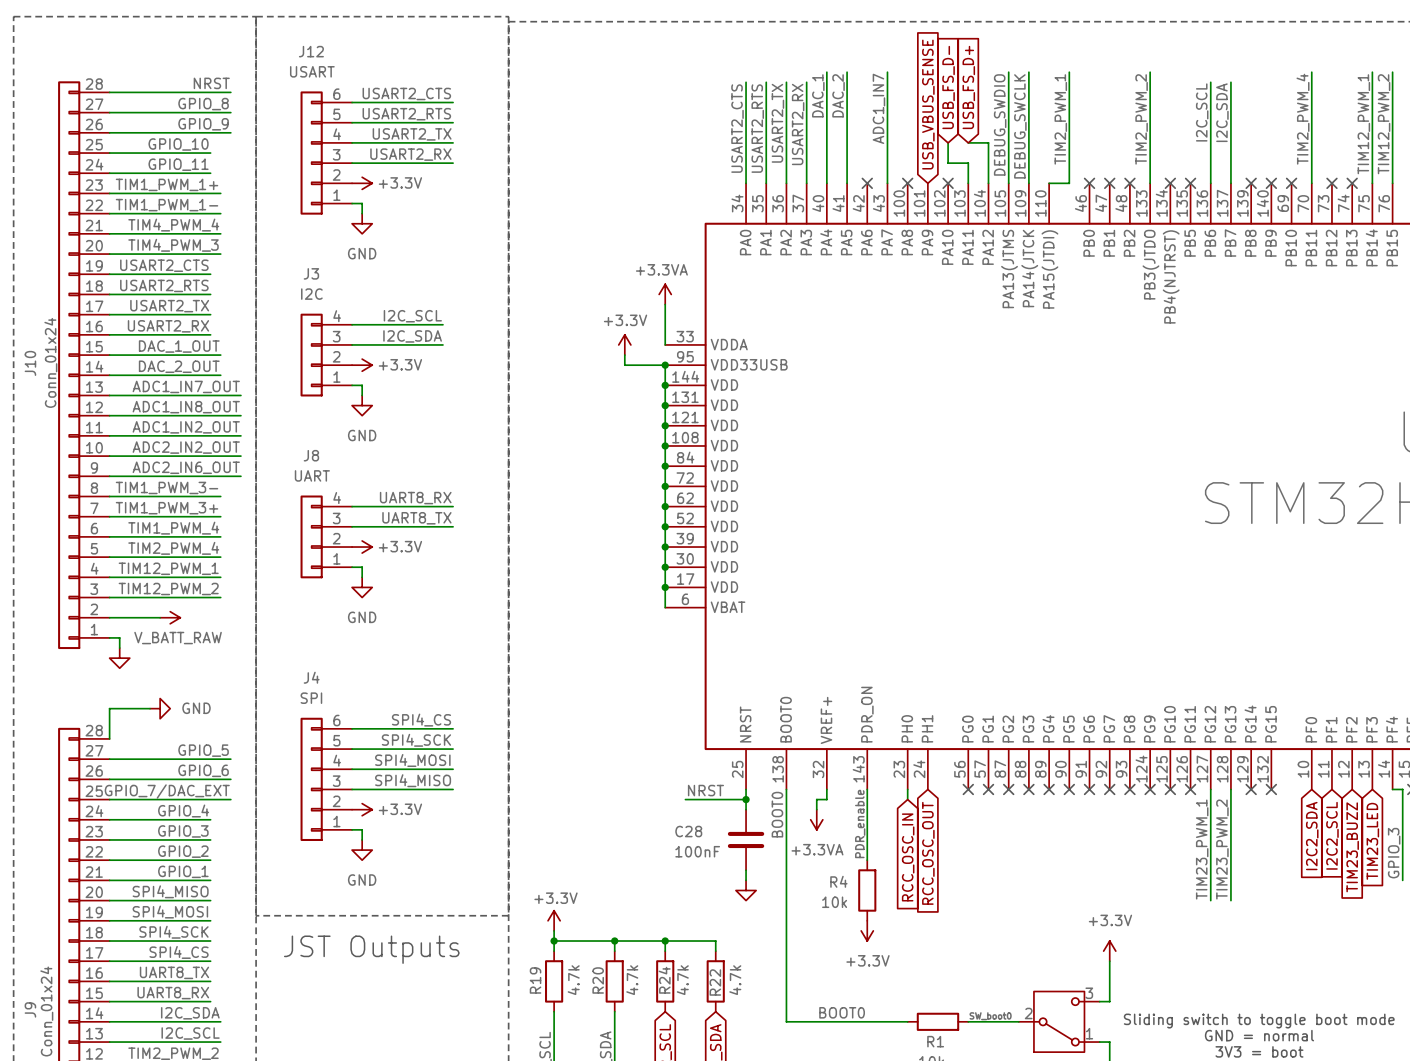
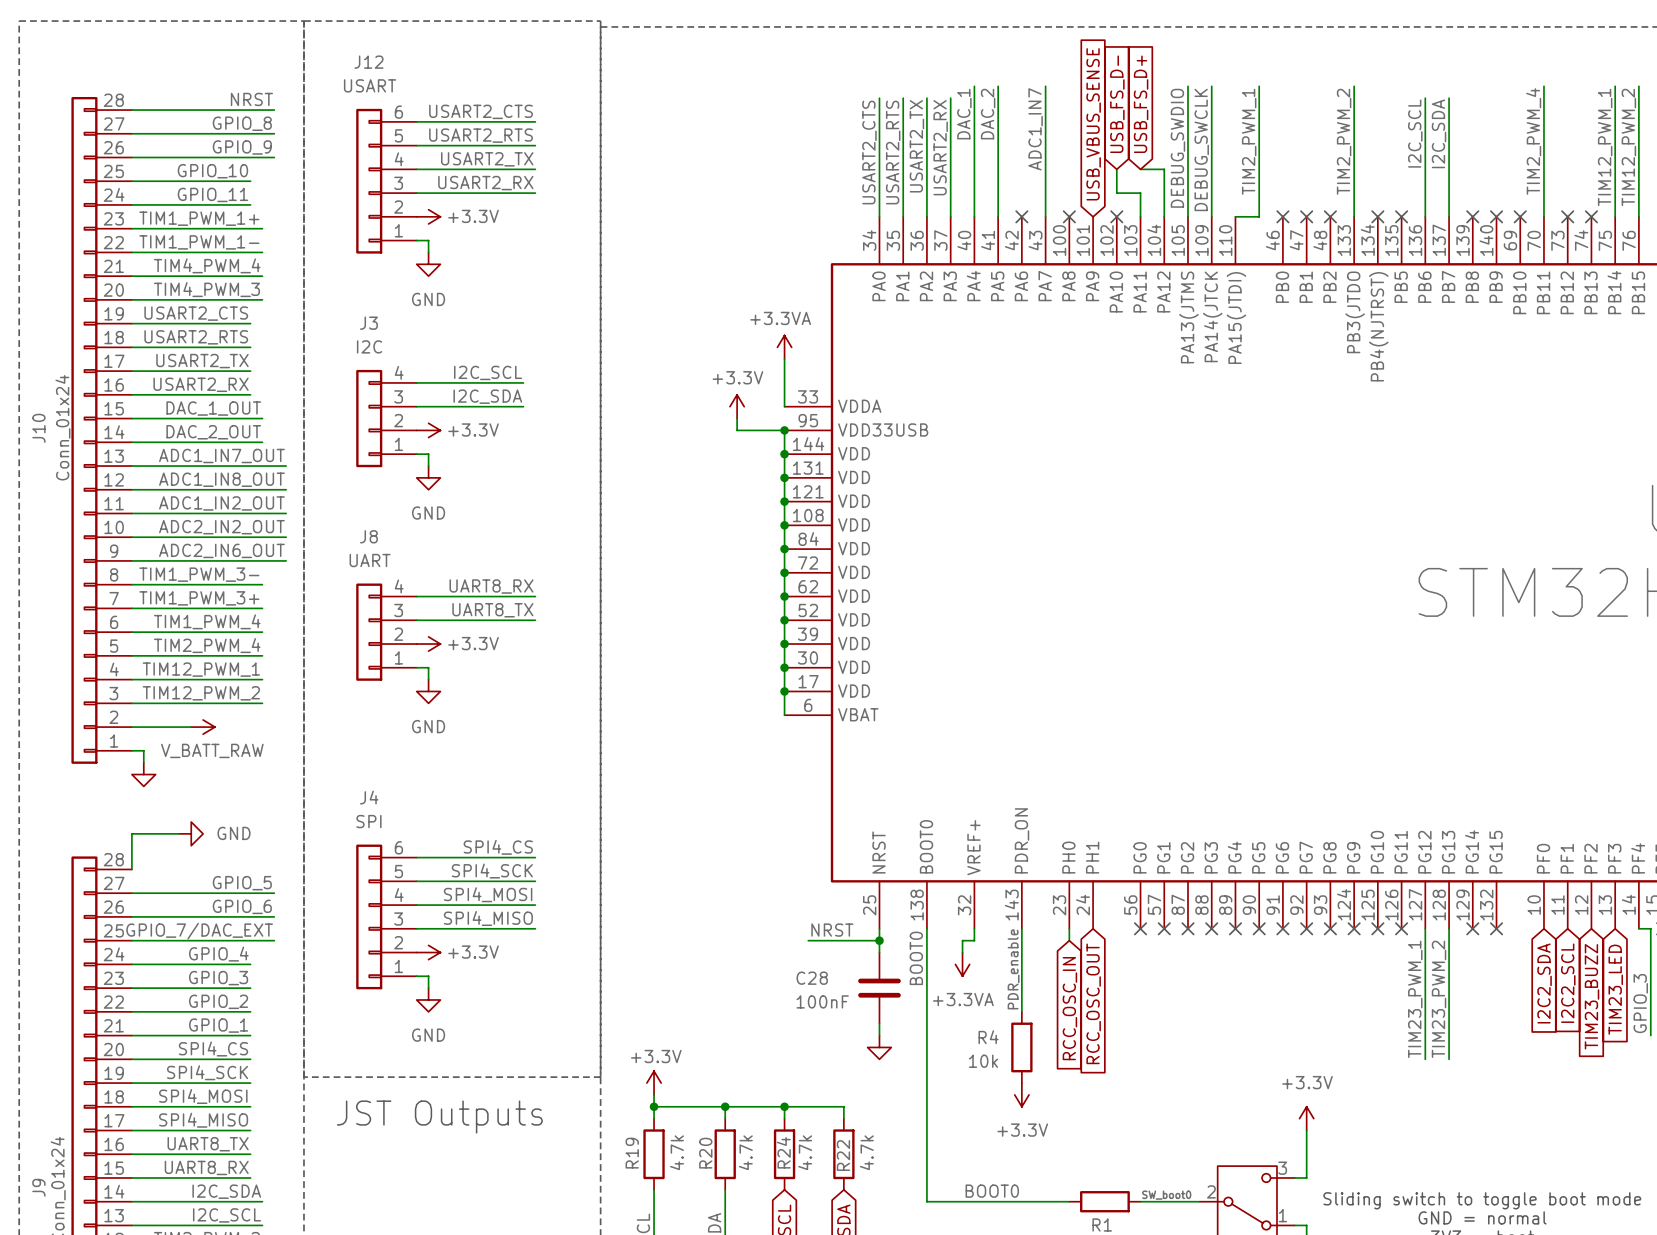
label: SPI4_MISO (170, 891) -> SPI4_CS (213, 1049)
label: SPI4_MOSI (170, 912) -> SPI4_SCK (207, 1072)
label: SPI4_SCK (173, 932) -> SPI4_MOSI (203, 1096)
label: SPI4_CS (179, 952) -> SPI4_MISO (203, 1120)

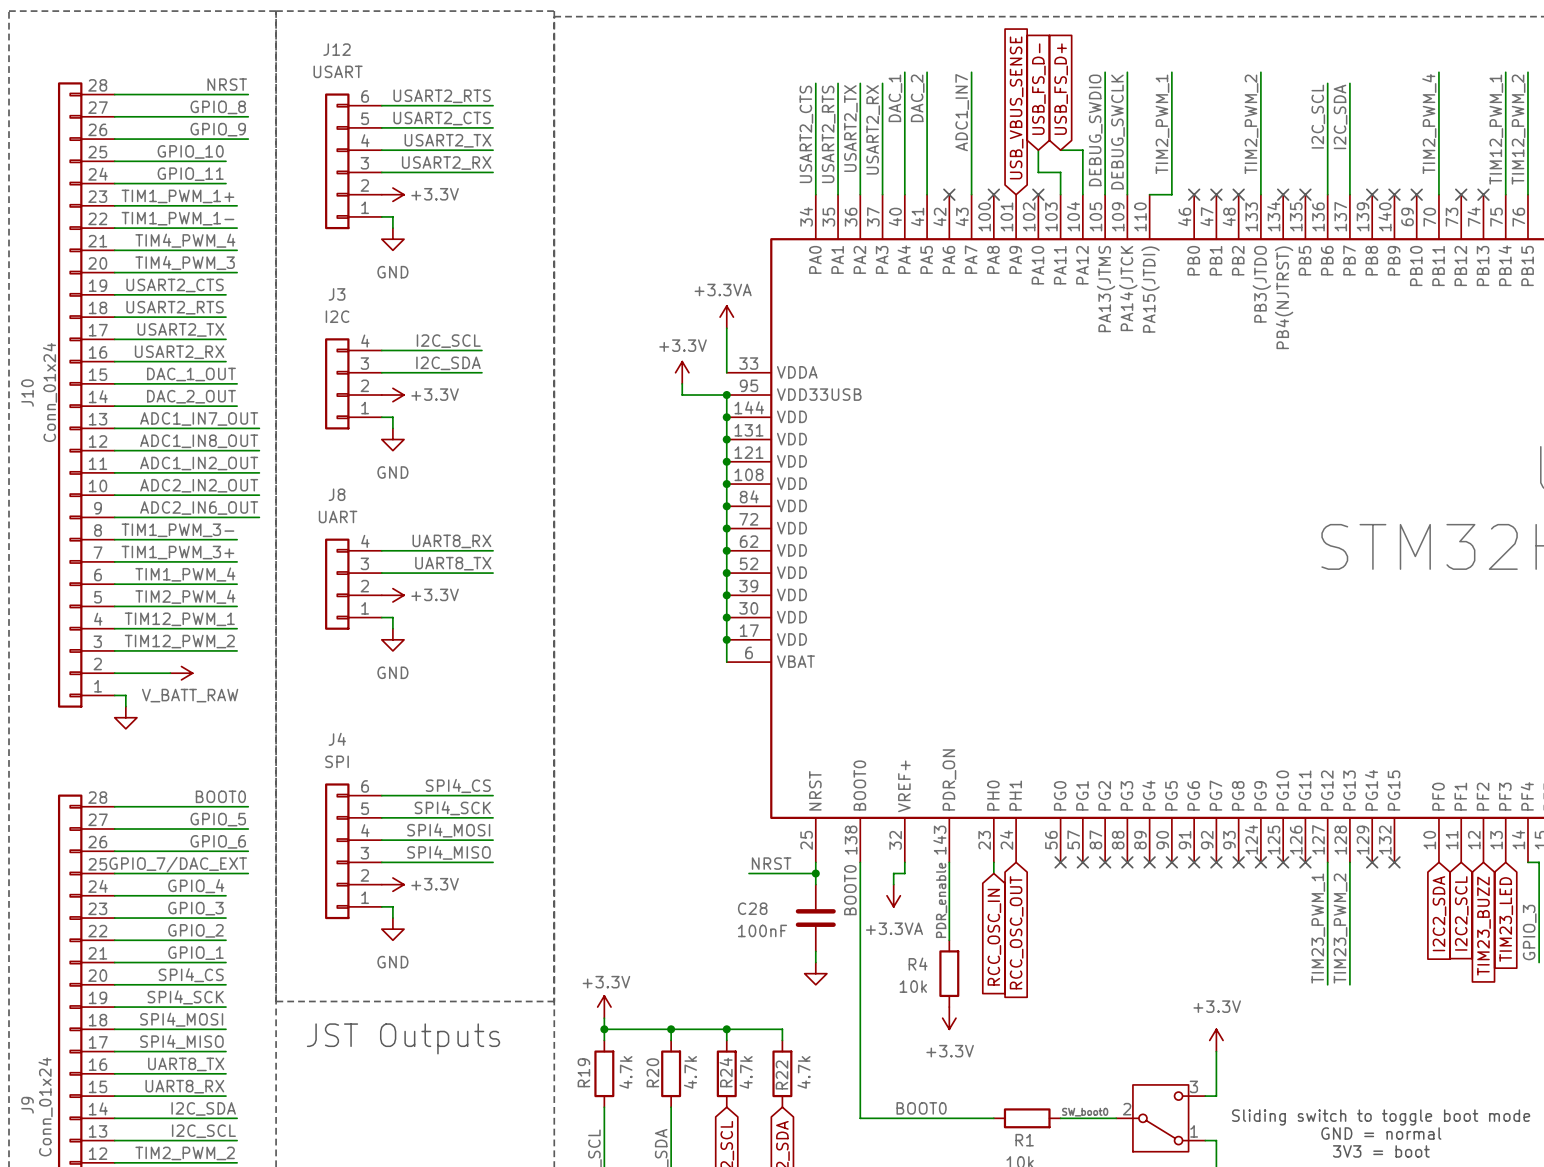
label: USART2_CTS (481, 111) -> USART2_RTS (442, 96)
label: USART2_RTS (481, 135) -> USART2_CTS (442, 118)
wire: (179, 833) (131, 833) (131, 869) -> (248, 806) (114, 806)
power symbol: GND (191, 833) -> none
label: none -> BOOT0 (220, 796)

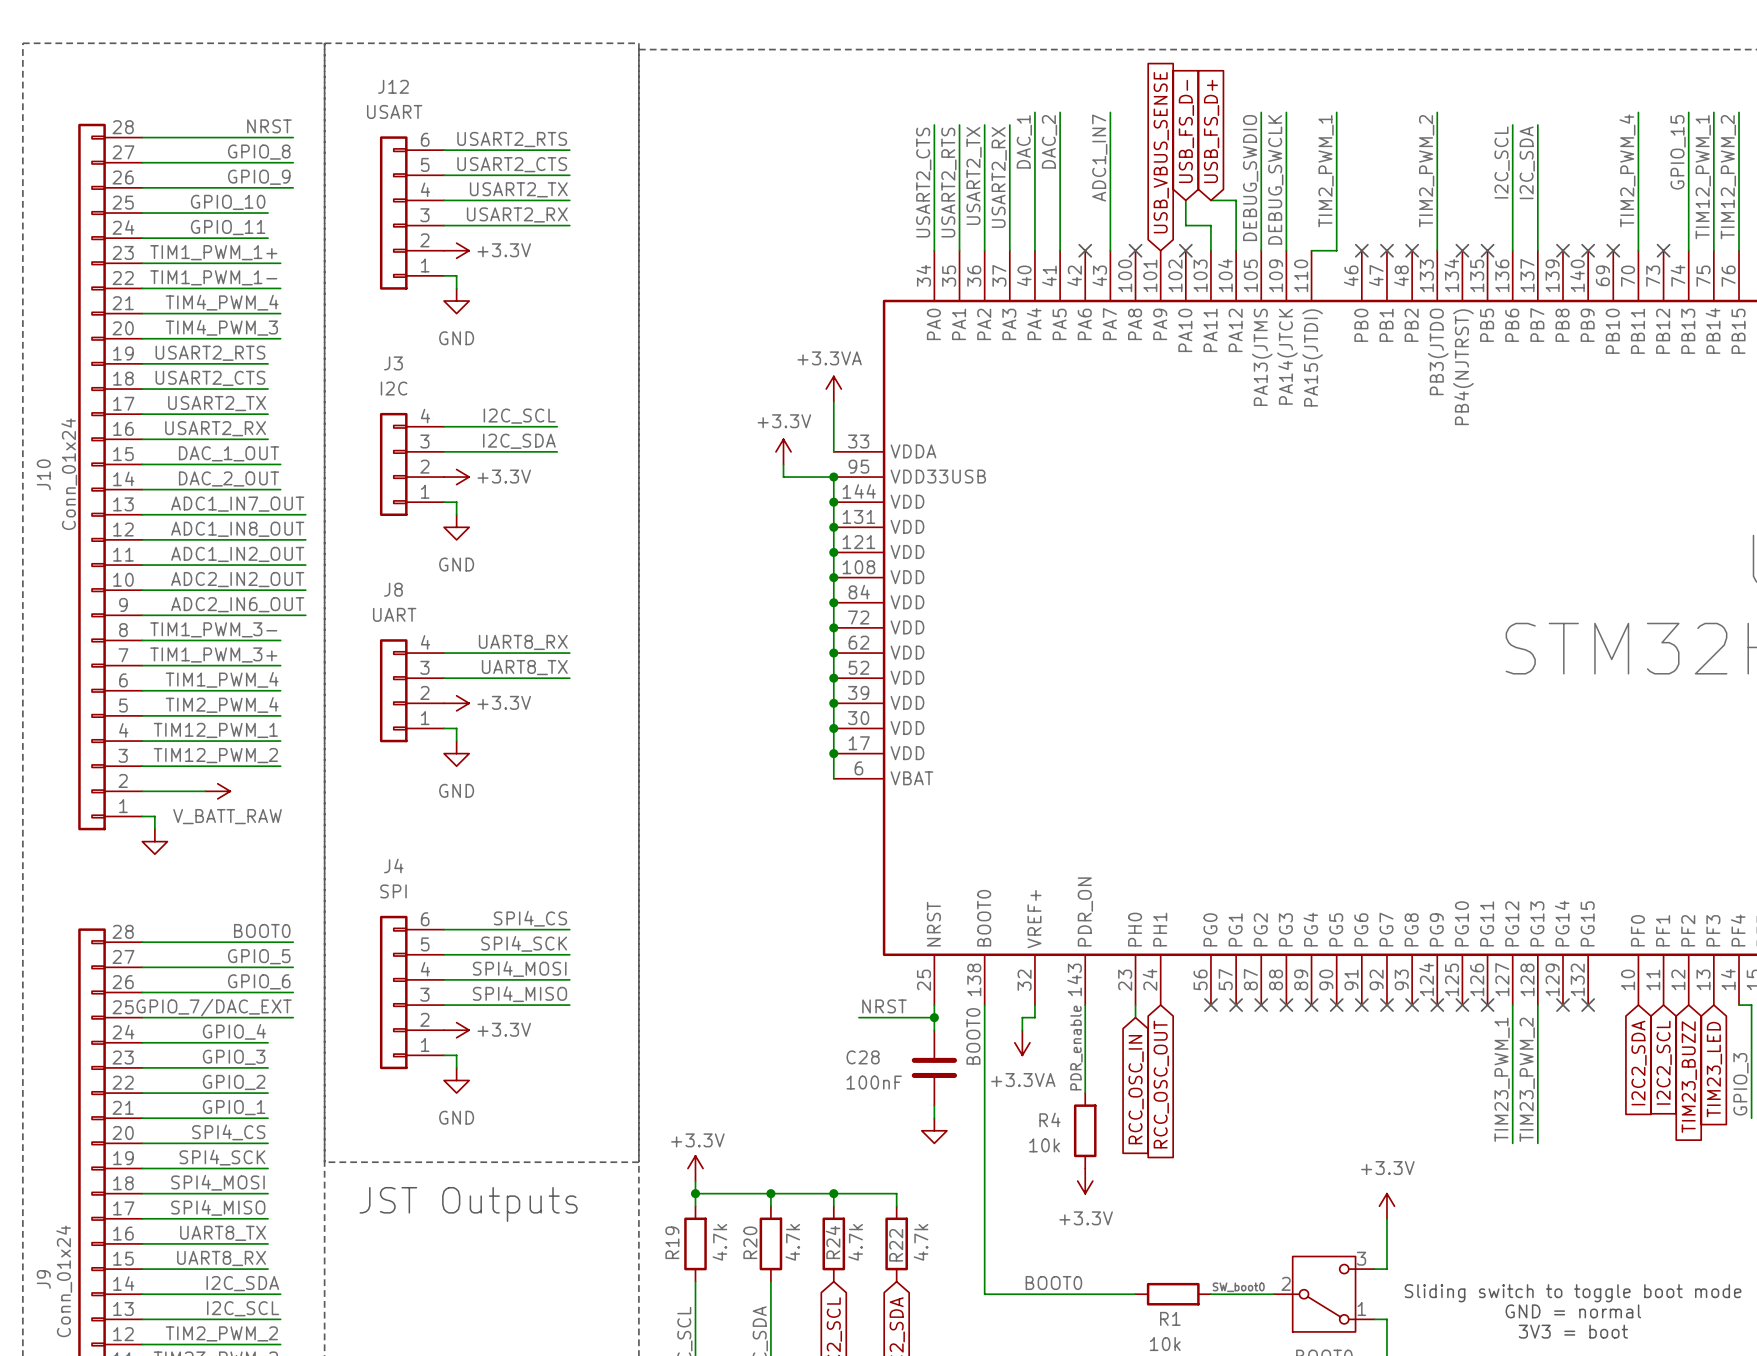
wire: none -> (1688, 112) (1688, 250)
label: none -> GPIO_15 (1678, 152)
no-connect mark: (1483, 194) -> none
label: USART2_CTS (175, 285) -> USART2_RTS (210, 353)
label: USART2_RTS (175, 307) -> USART2_CTS (210, 378)

